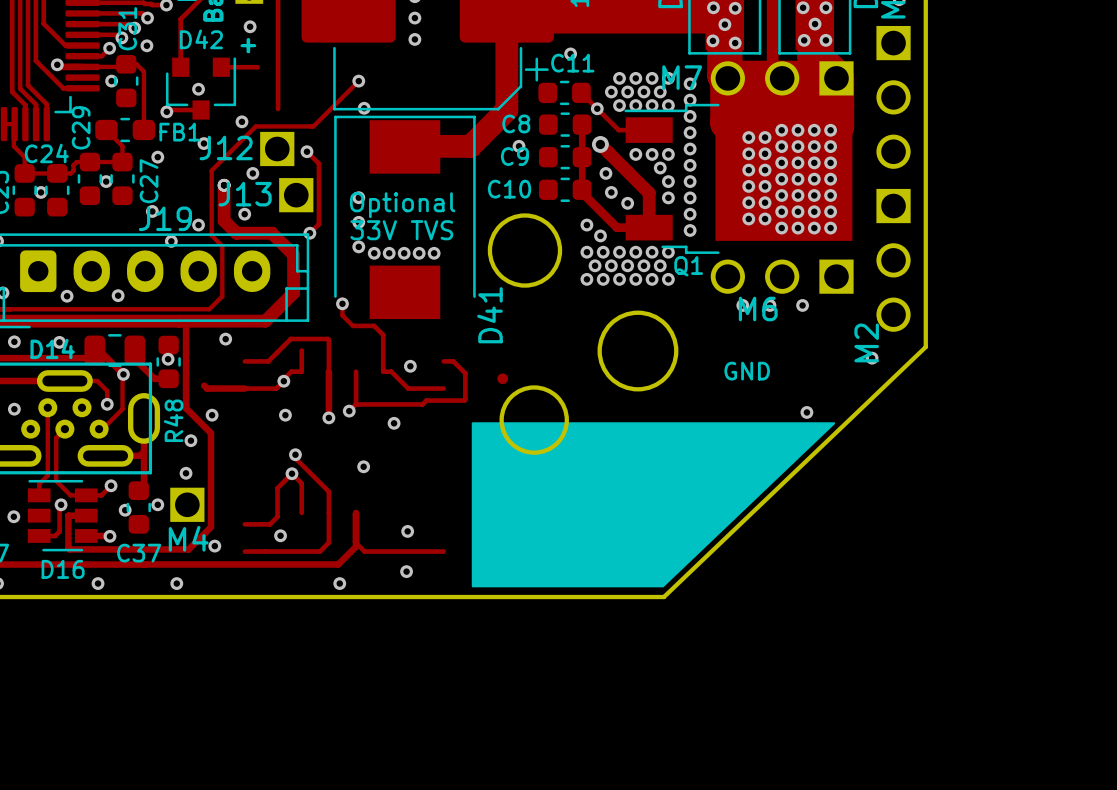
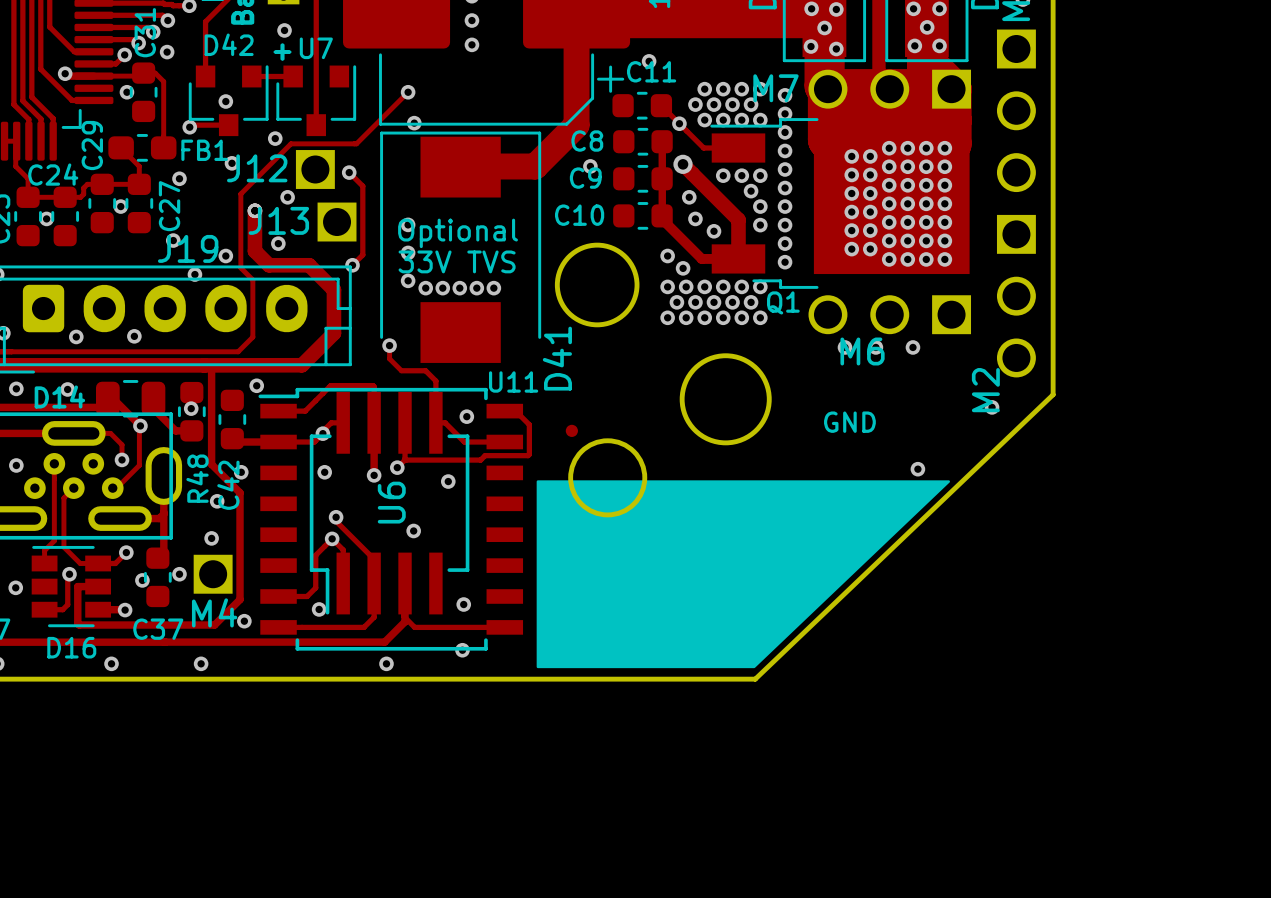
U7: none -> (316, 100)
C42: none -> (232, 419)
U6: none -> (389, 503)
U11: none -> (390, 519)

